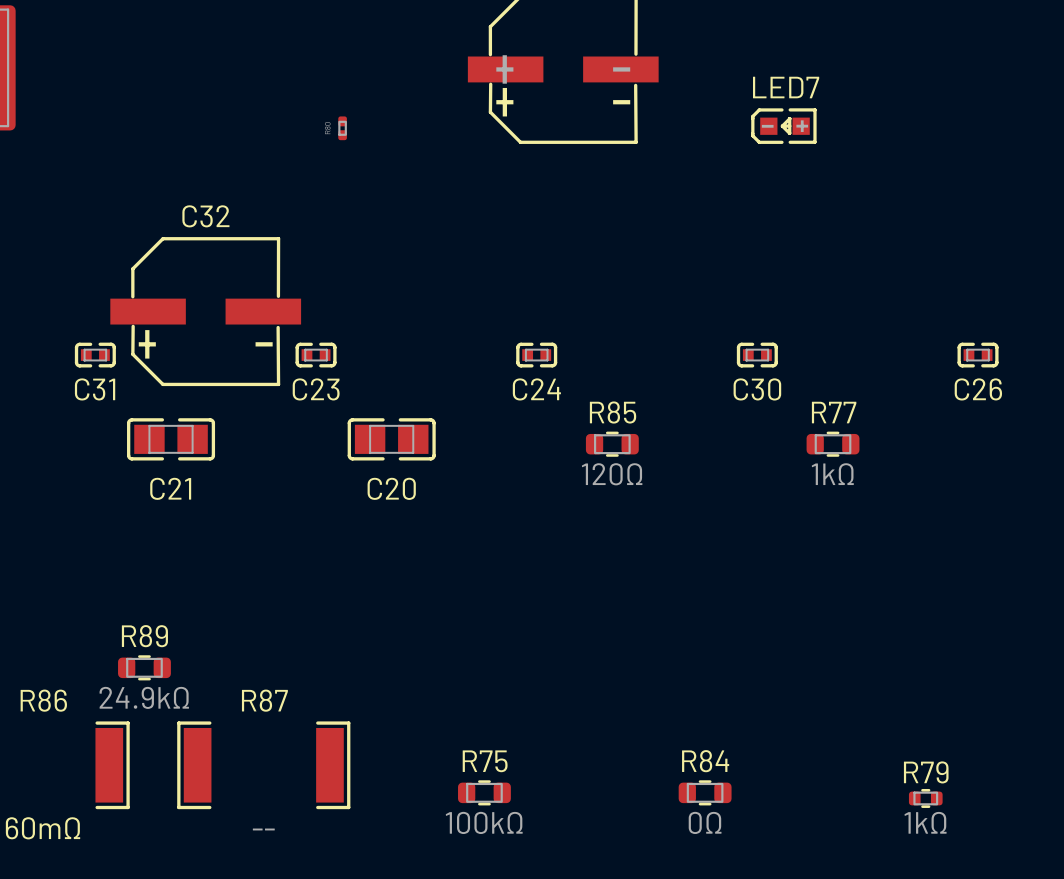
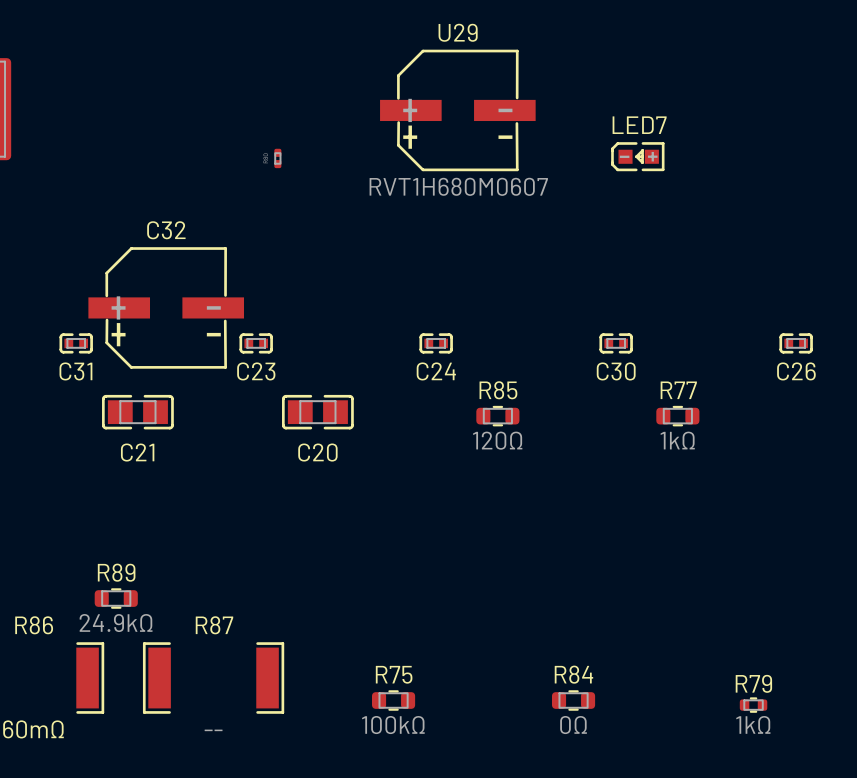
U29 value: none -> RVT1H680M0607 (458, 186)
C32 footprint: [110, 237, 302, 387] -> [88, 247, 245, 369]

